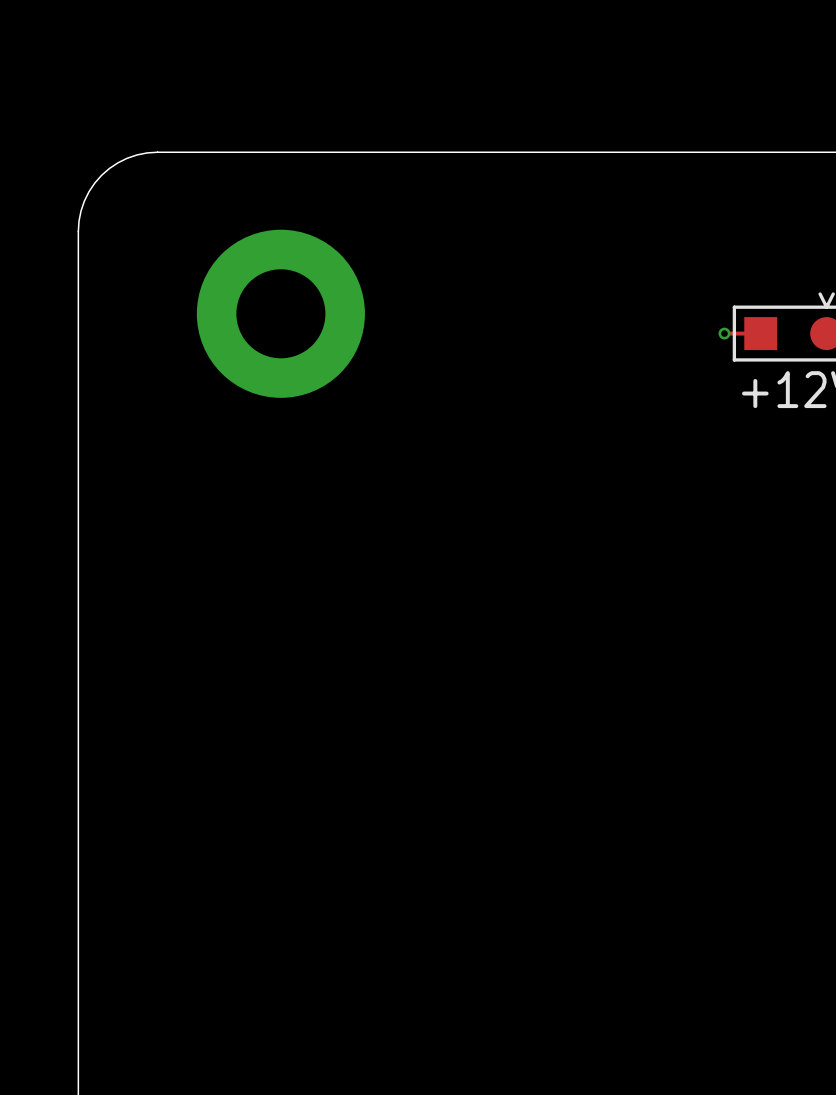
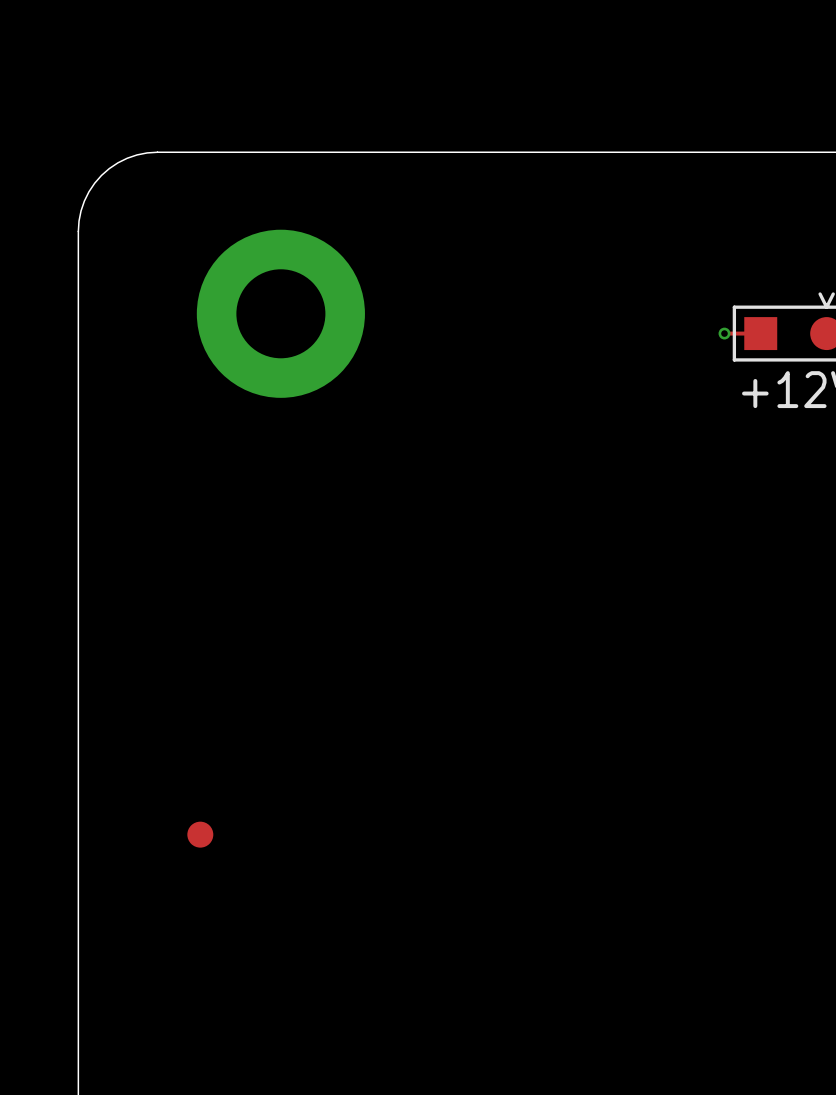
part: none -> (200, 834)

